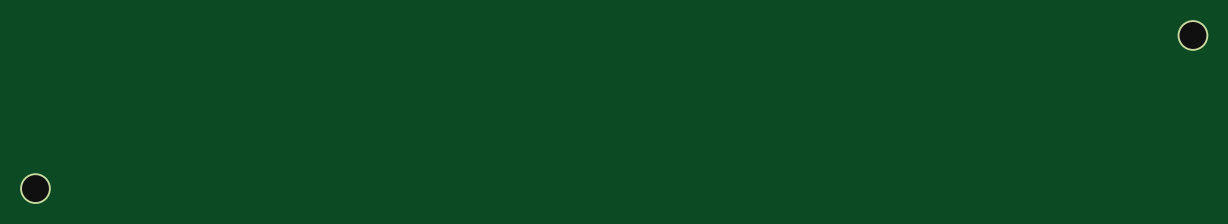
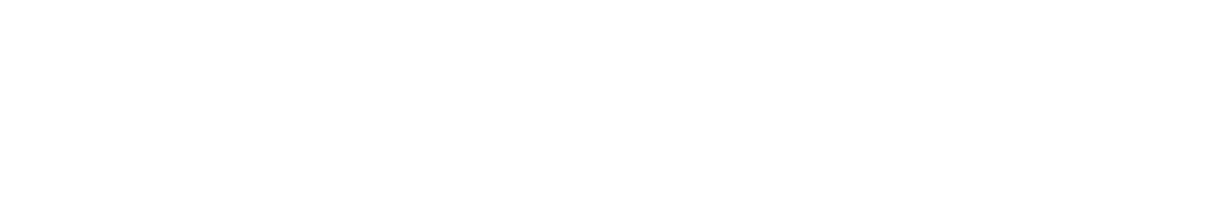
part: (1192, 35) -> none
part: (35, 188) -> none

